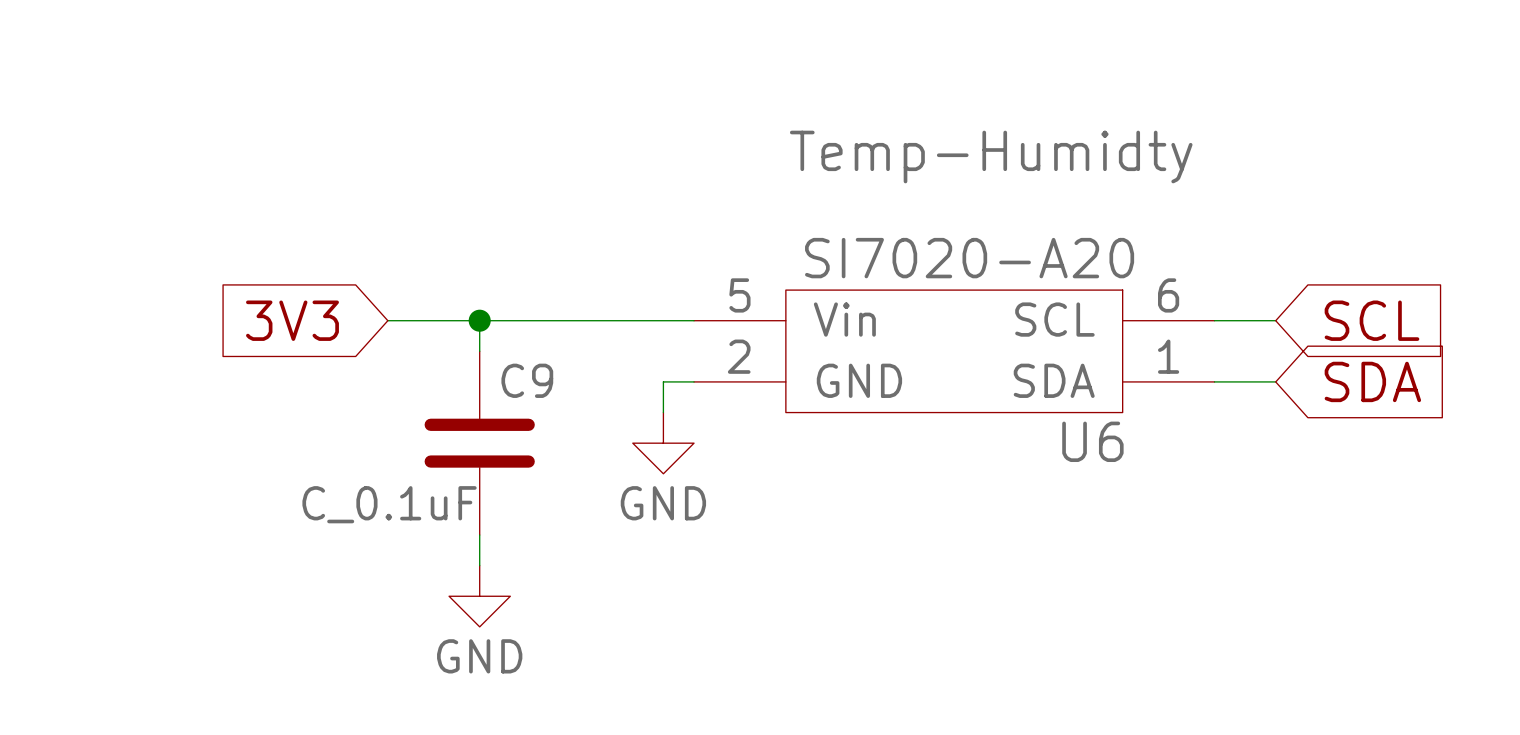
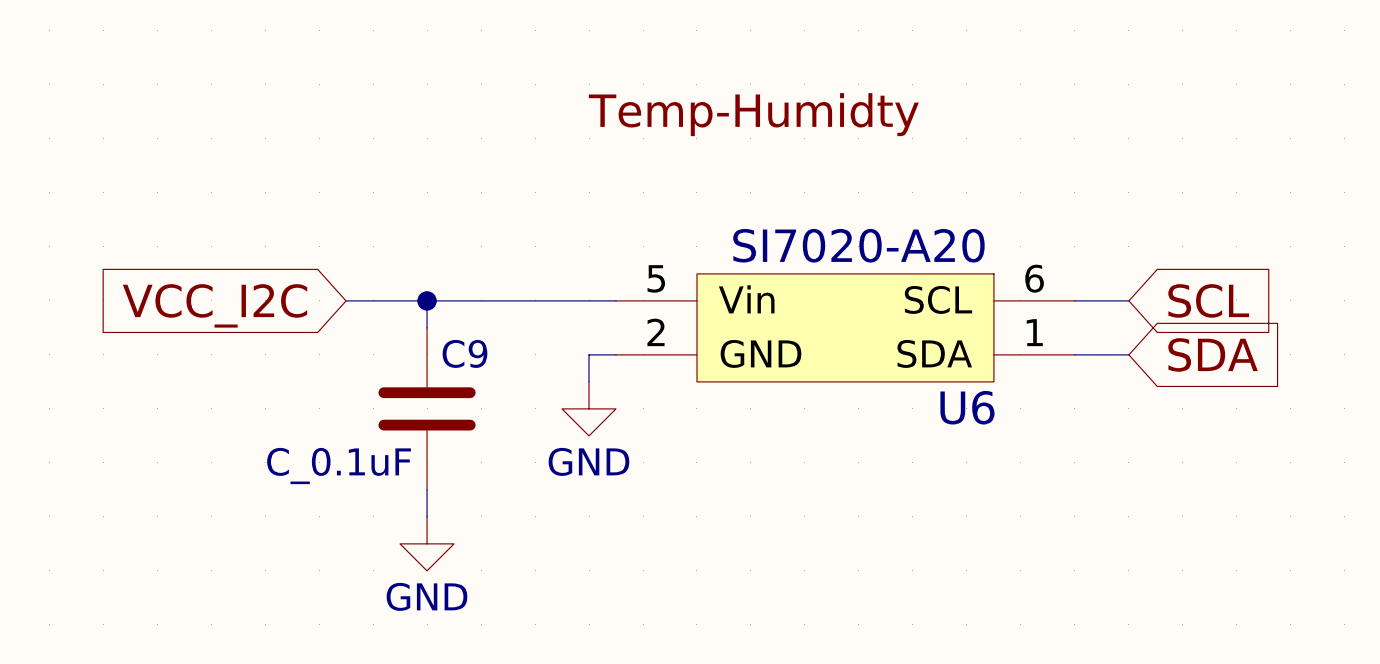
label position: Temp-Humidty (991, 157) -> Temp-Humidty (753, 114)
global label: 3V3 (292, 320) -> VCC_I2C (215, 305)

